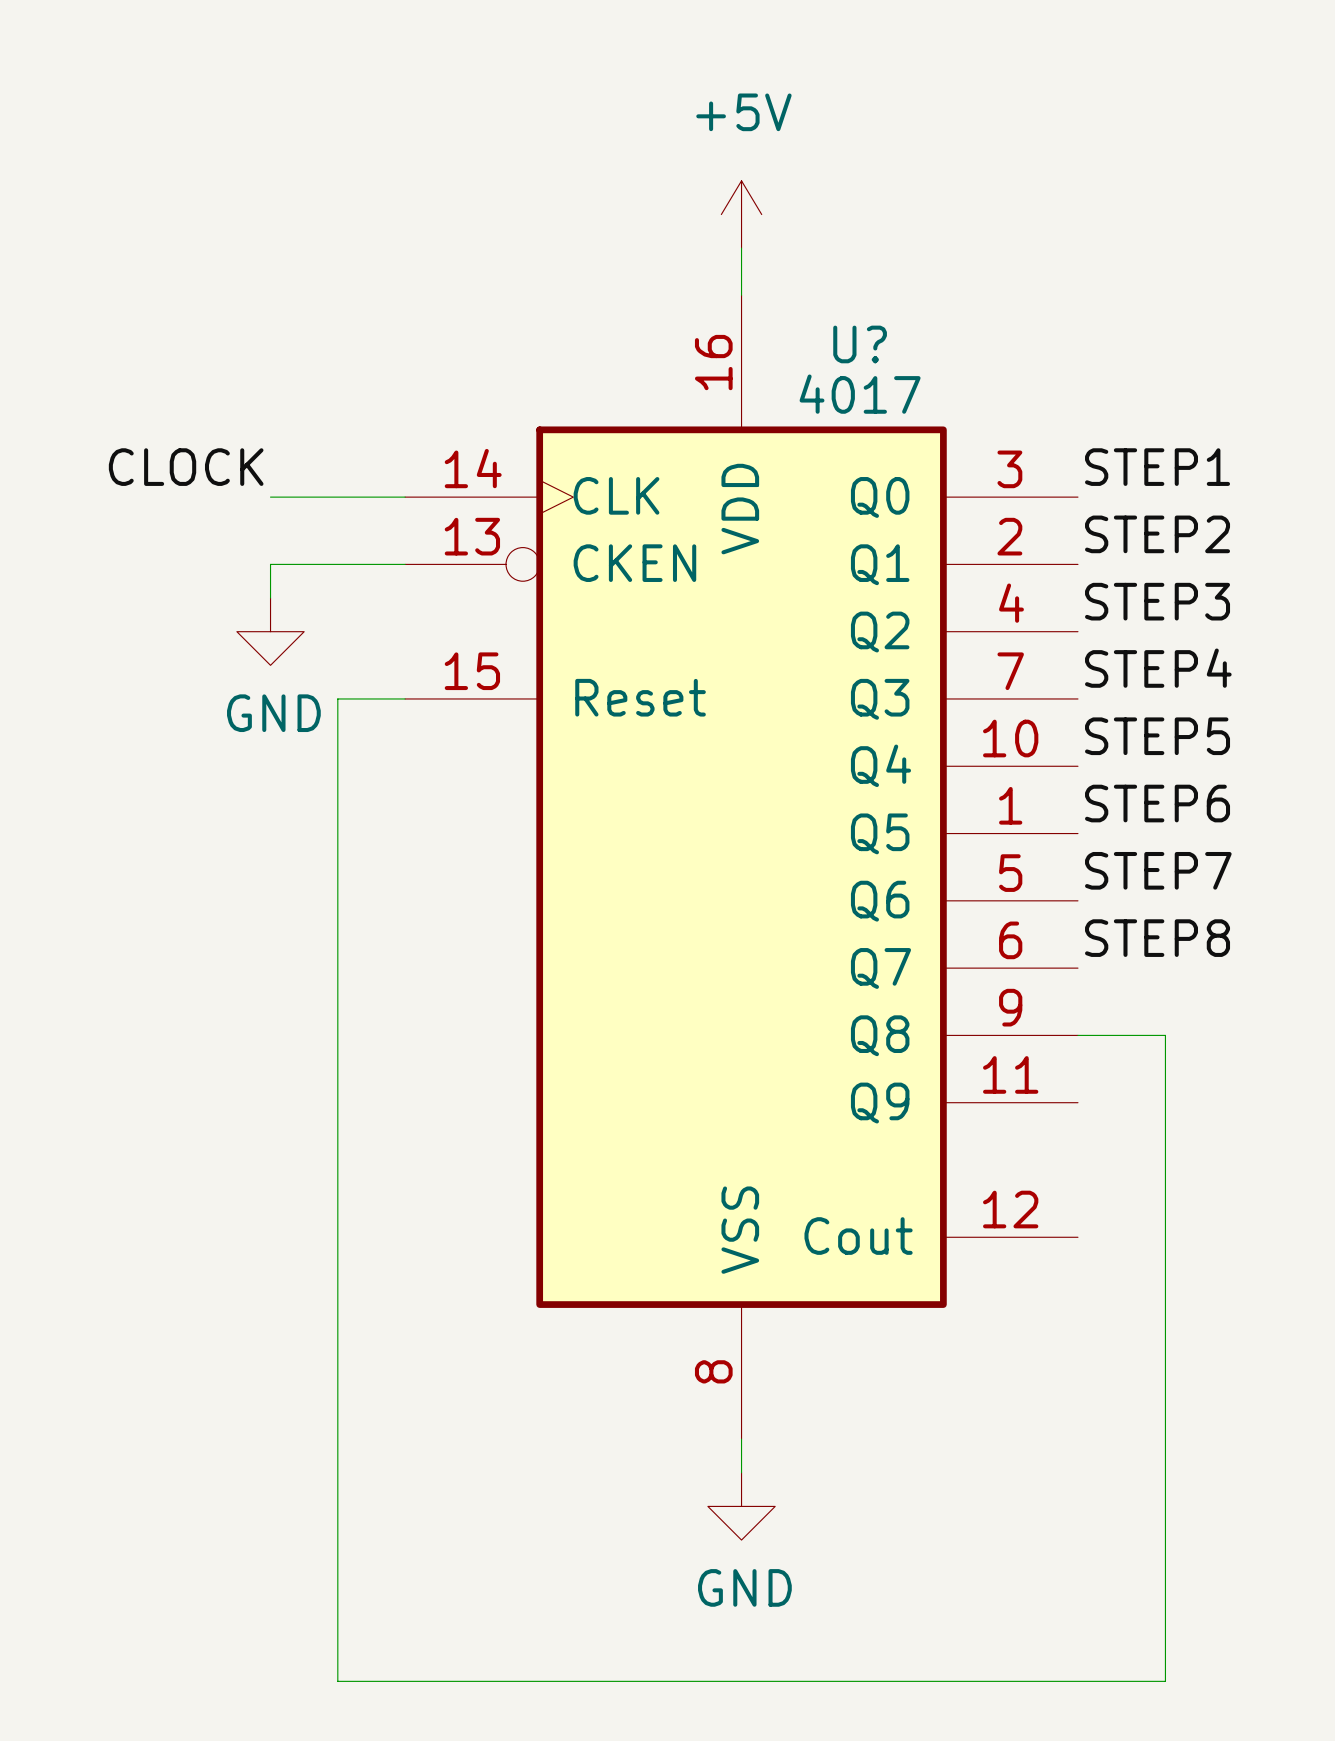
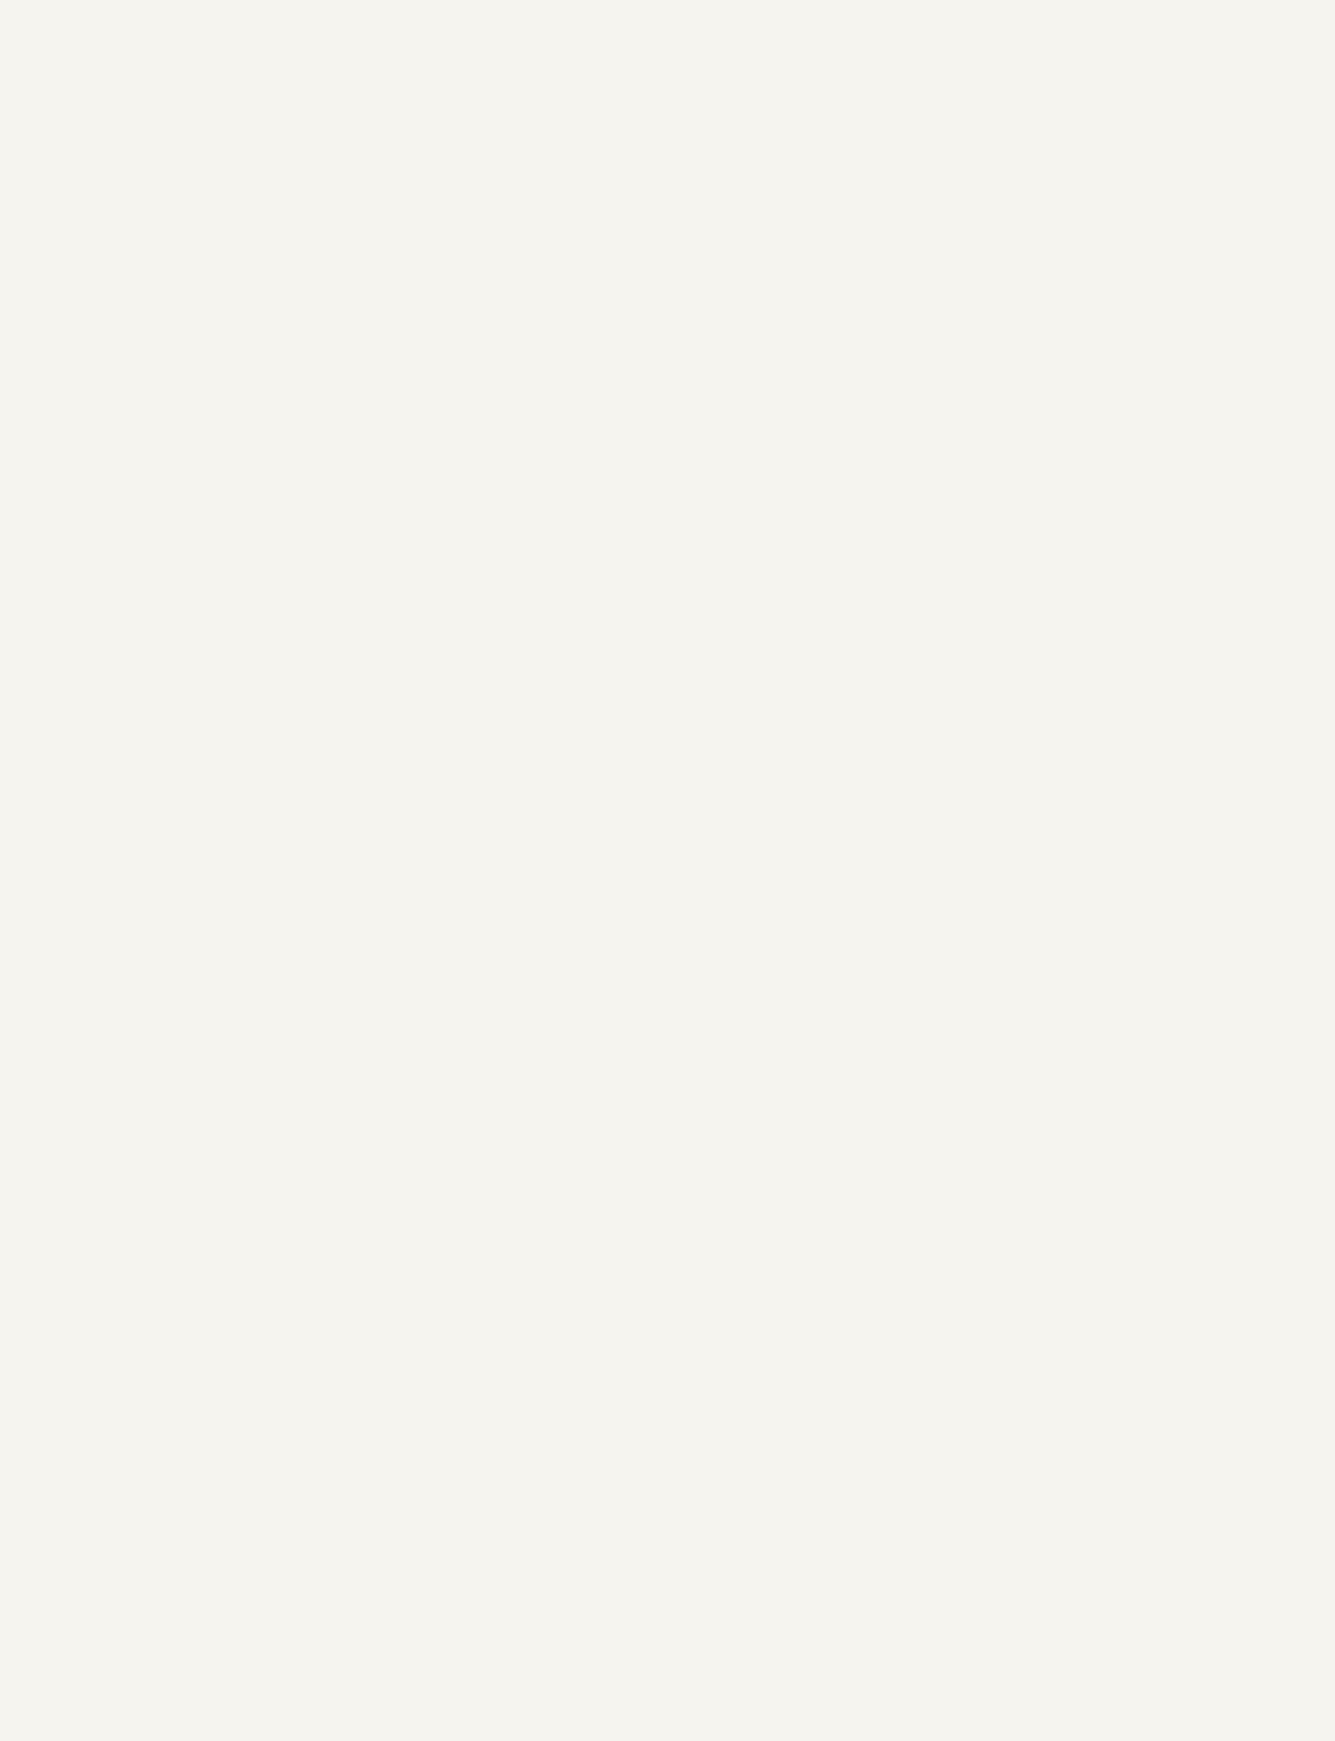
power symbol: +5V (741, 214) -> none
wire: (741, 248) (741, 295) -> none
label: CLOCK (186, 467) -> none
label: STEP1 (1157, 467) -> none
wire: (270, 497) (405, 497) -> none
label: STEP2 (1157, 534) -> none
wire: (405, 564) (270, 564) (270, 598) -> none
label: STEP3 (1157, 601) -> none
power symbol: GND (270, 631) -> none
label: STEP4 (1158, 668) -> none
wire: (405, 698) (337, 698) (337, 1681) (1165, 1681) (1165, 1035) (1077, 1035) -> none
label: STEP5 (1157, 736) -> none
label: STEP6 (1157, 803) -> none
U?: 4017 (741, 867) -> none
label: STEP7 (1158, 870) -> none
label: STEP8 (1157, 938) -> none
wire: (741, 1439) (741, 1472) -> none
power symbol: GND (741, 1506) -> none

